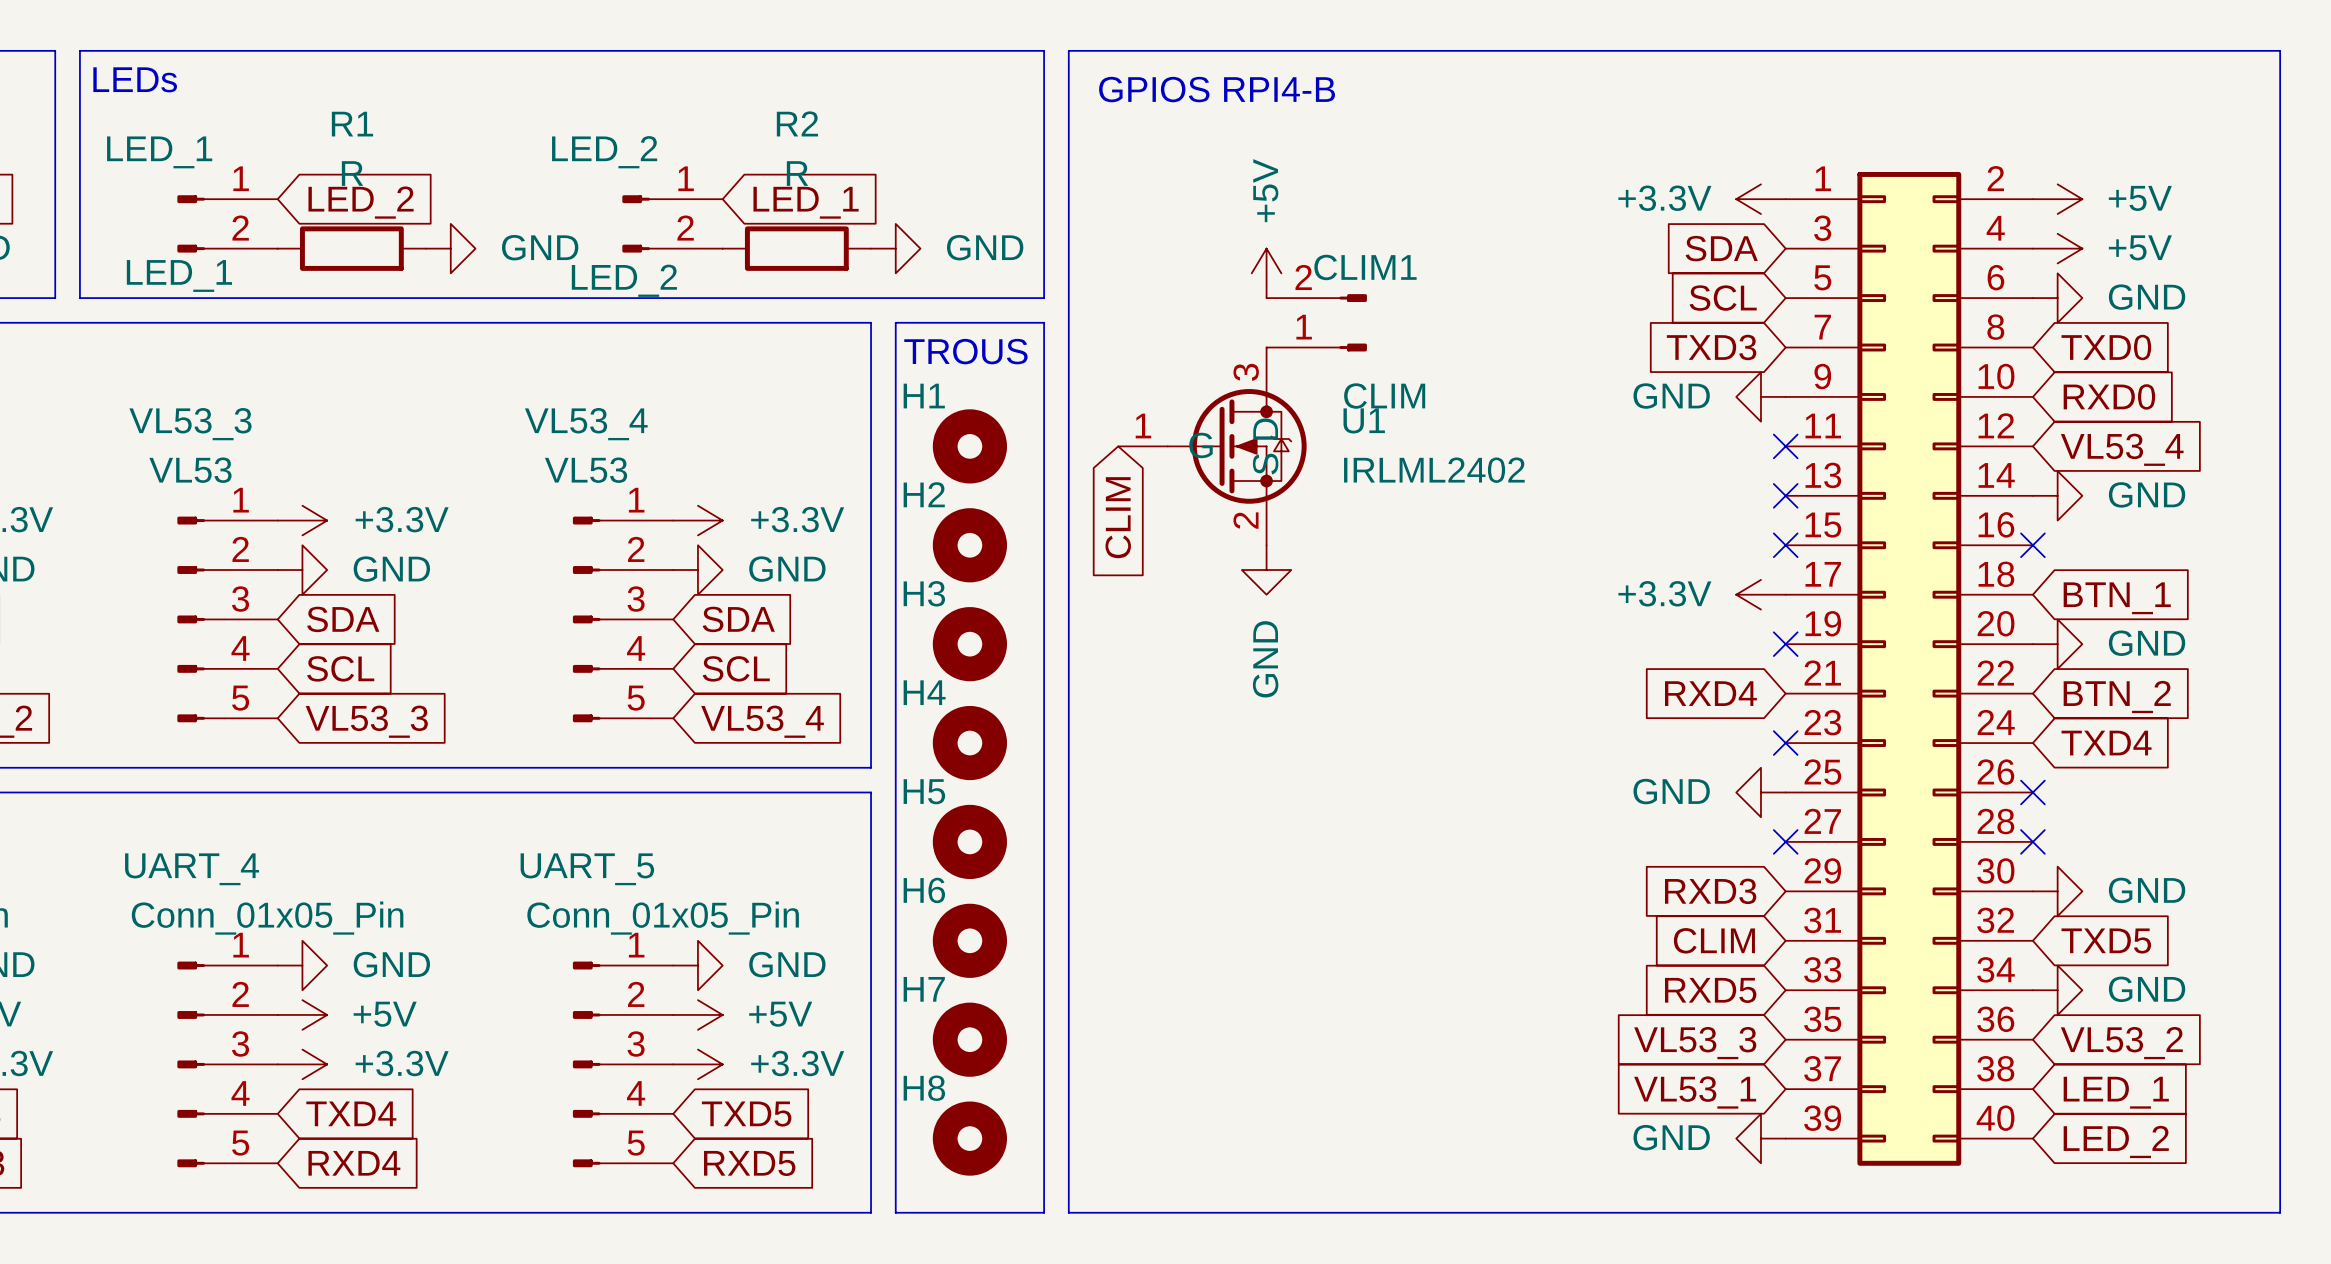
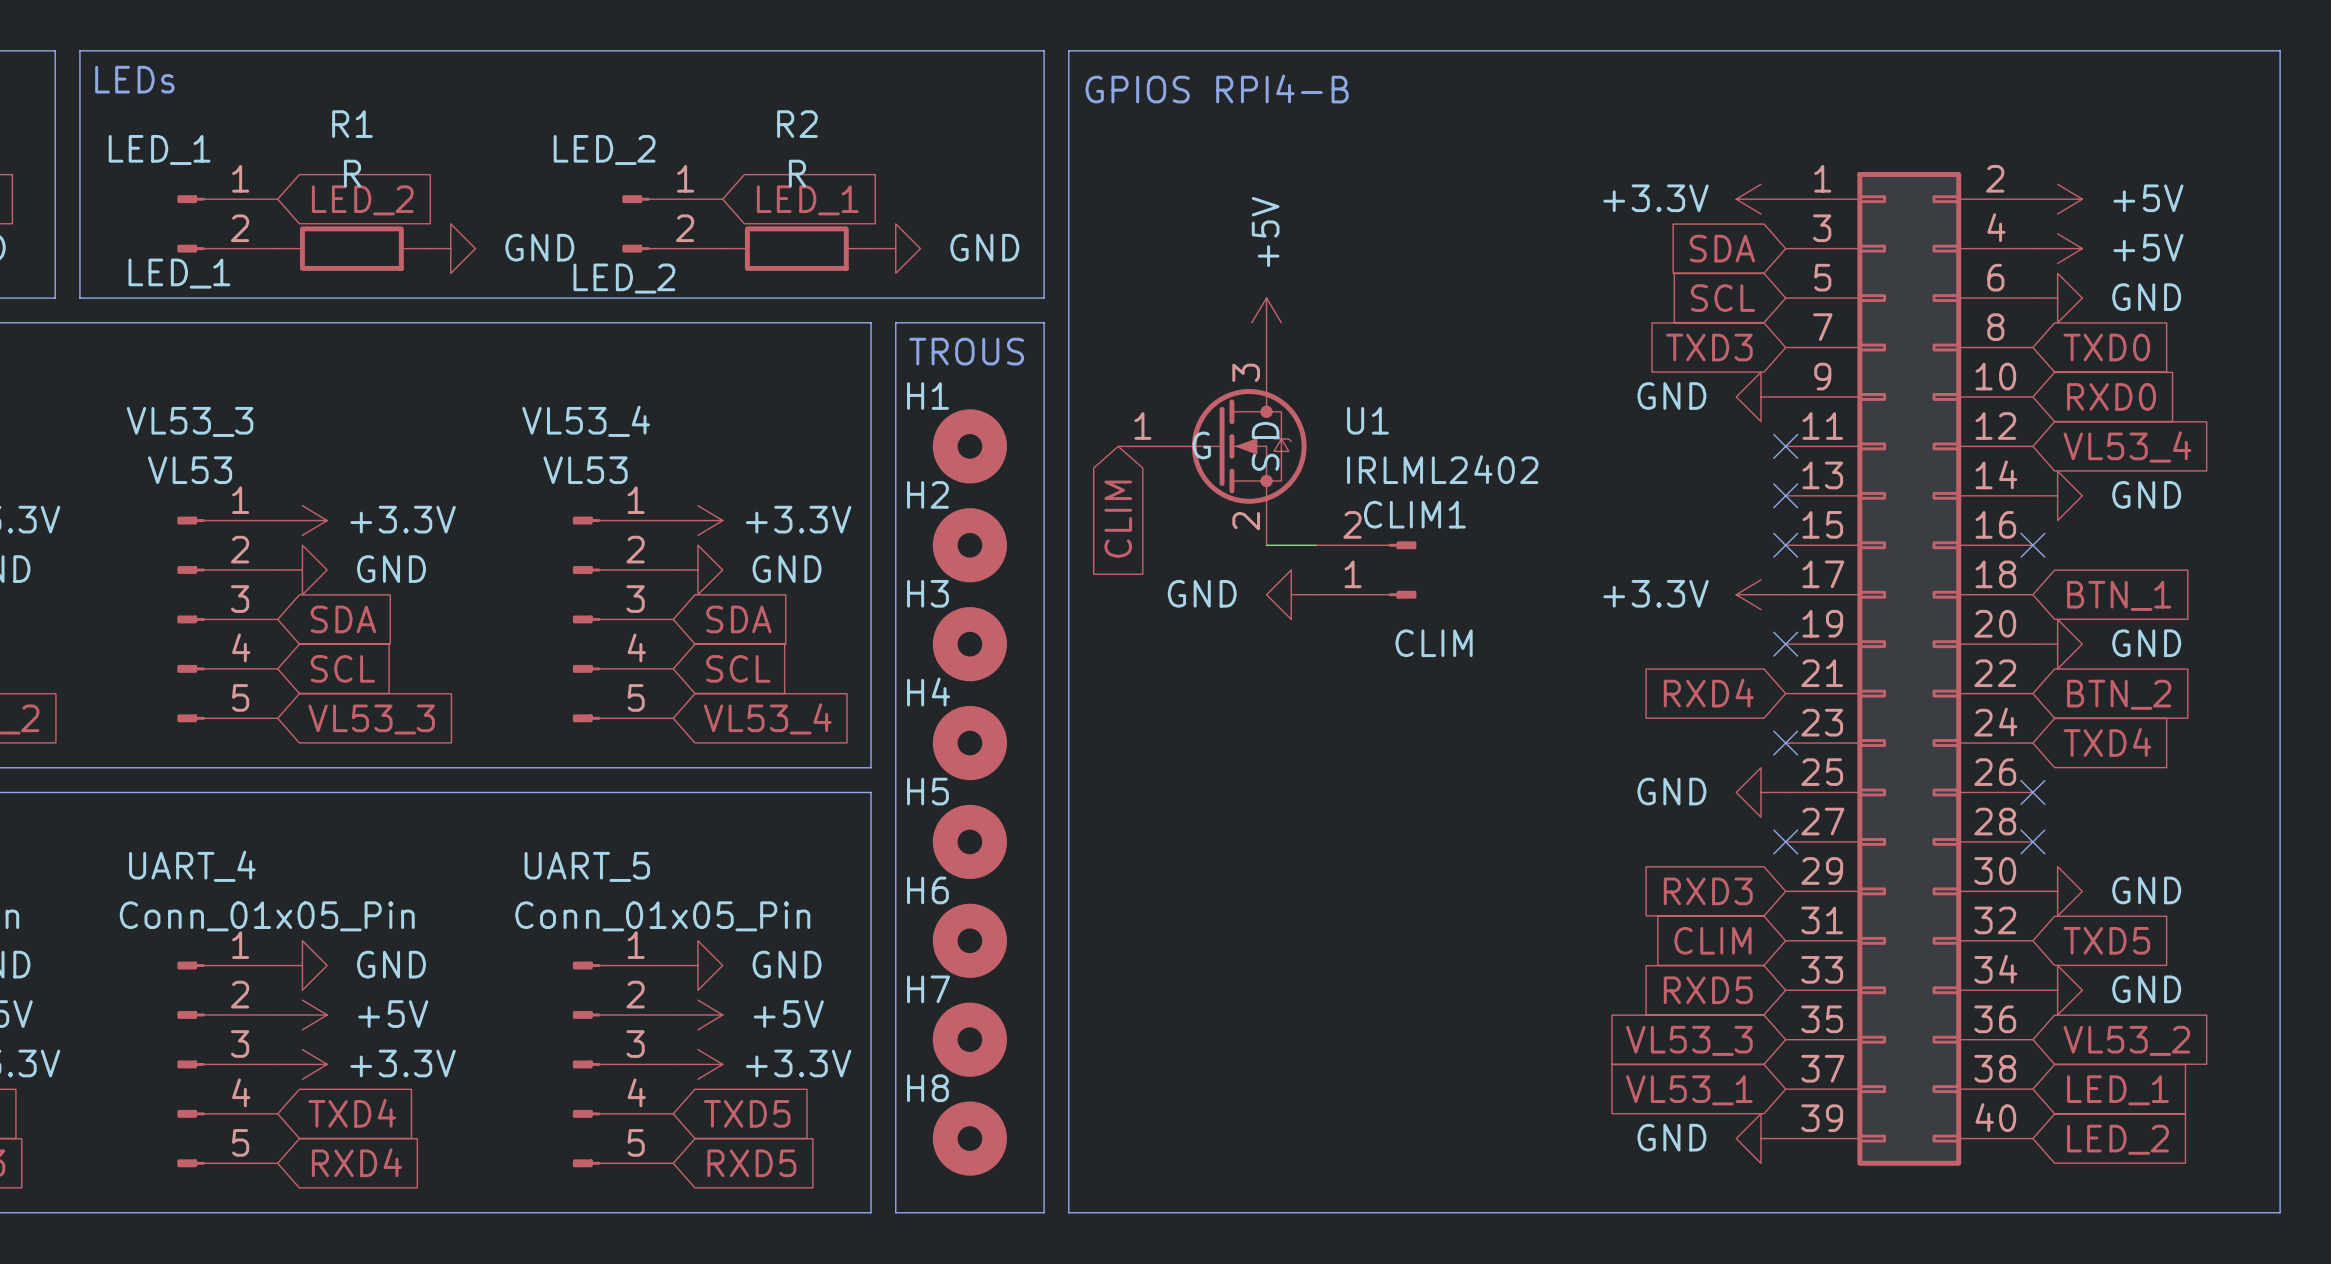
power symbol position: +5V (1266, 273) -> +5V (1266, 322)
CLIM1 position: (1316, 322) -> (1366, 570)
wire: none -> (1266, 545) (1316, 545)
power symbol rotation: 0° (1266, 570) -> 90° clockwise (1291, 594)
power symbol position: GND (1266, 570) -> GND (1291, 594)

